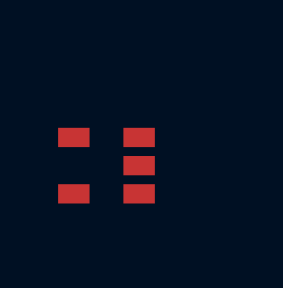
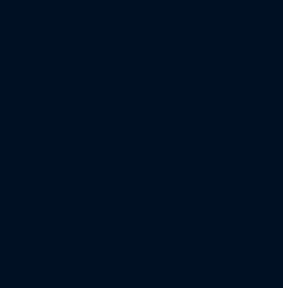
part: (106, 165) -> none

